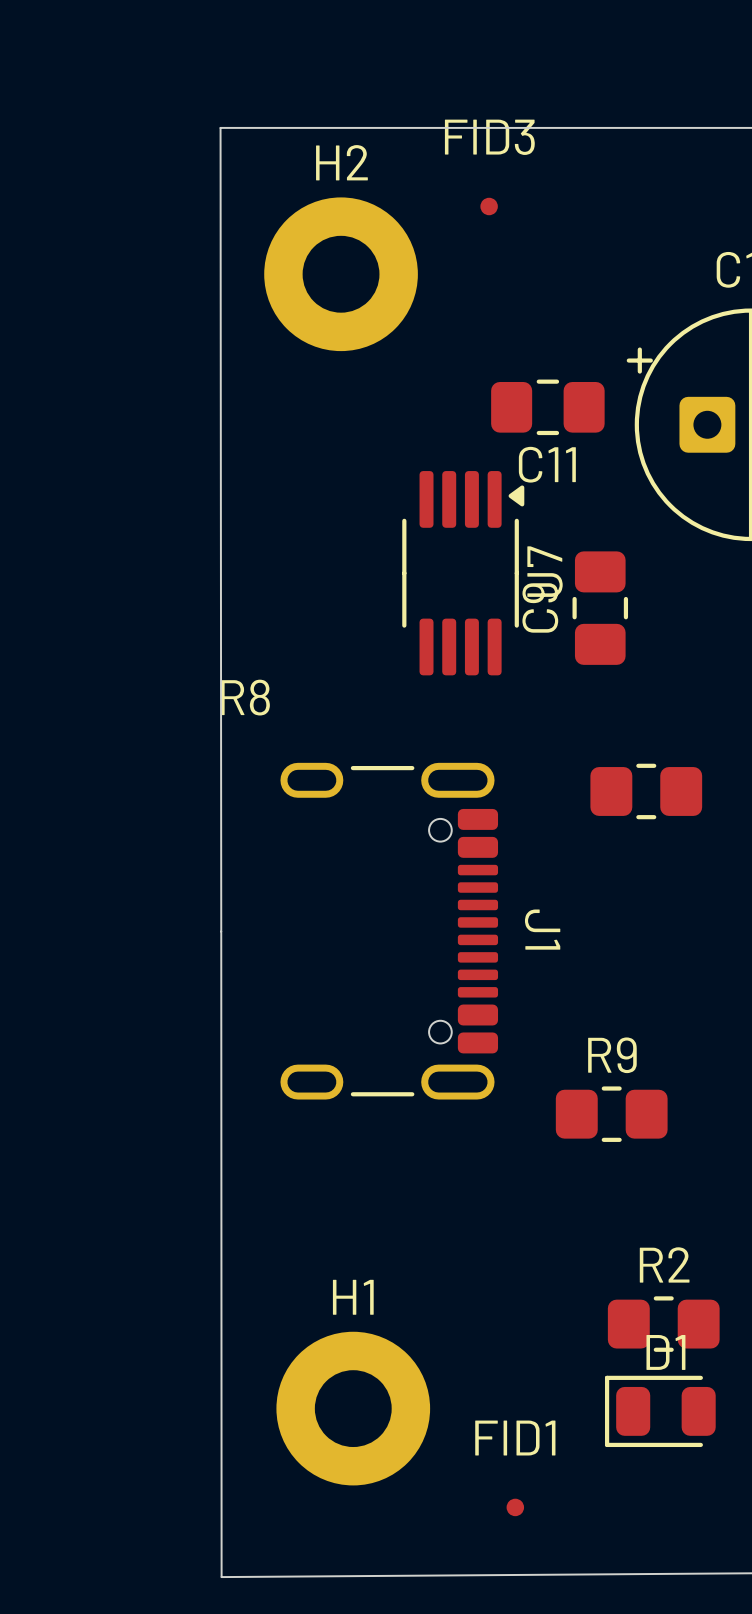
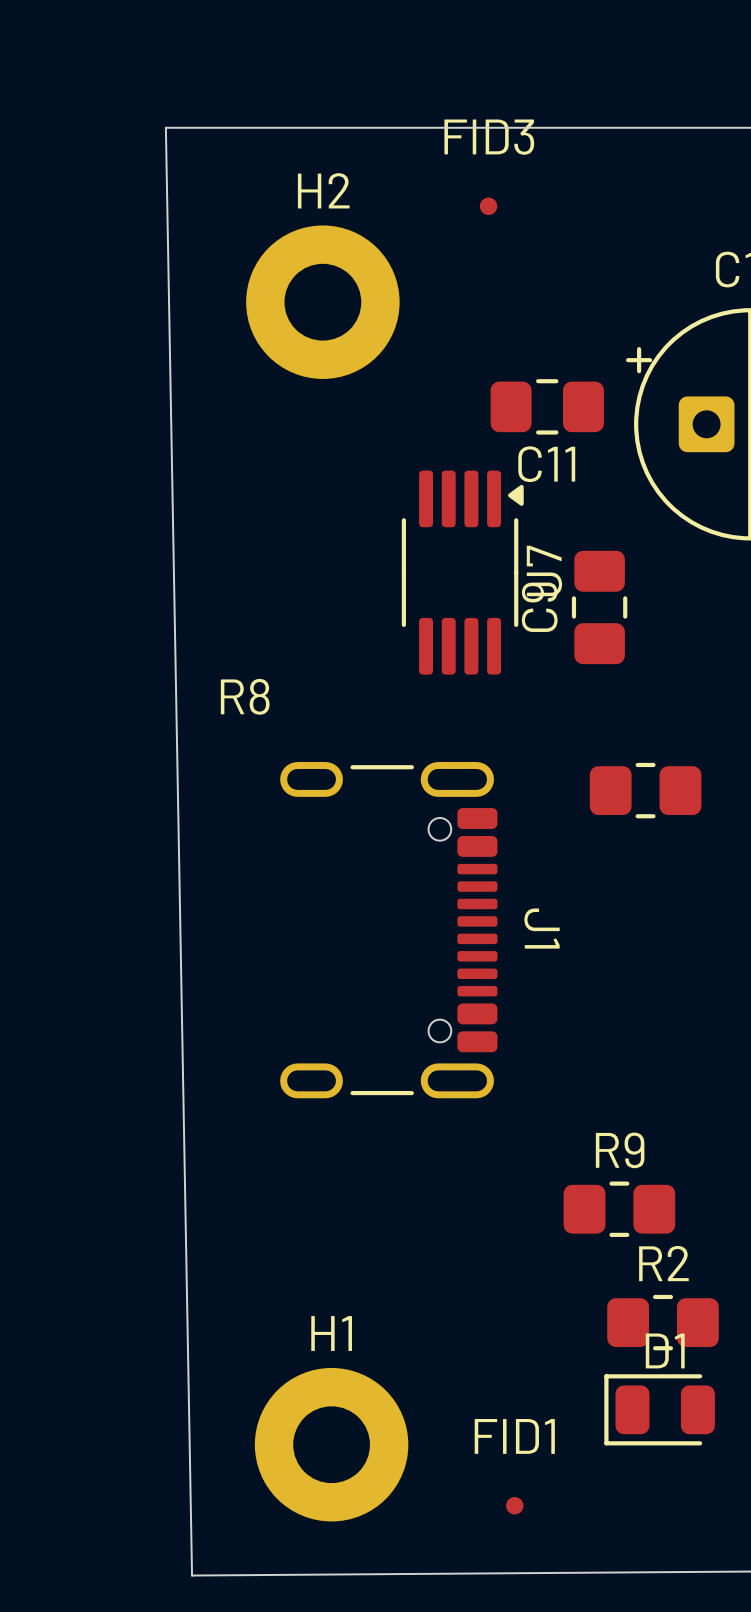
board edge: (220, 127) (221, 1576) -> (220, 127) (165, 127) (192, 1575) (221, 1575)
H2 position: (341, 274) -> (322, 302)
R9 position: (611, 1114) -> (619, 1209)
H1 position: (353, 1408) -> (331, 1444)

